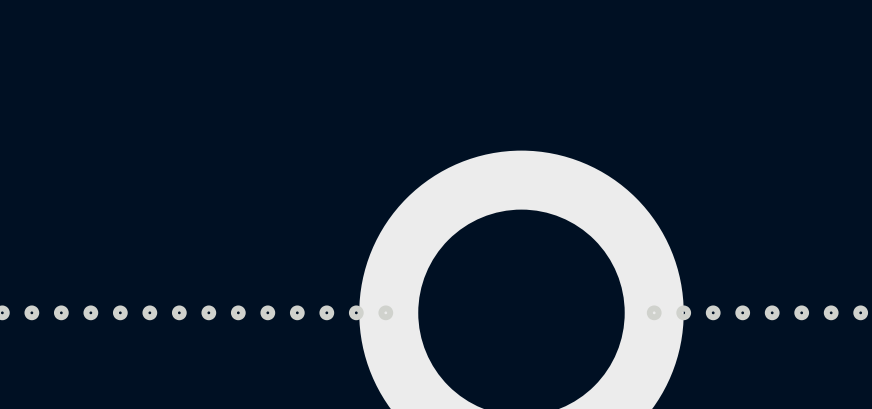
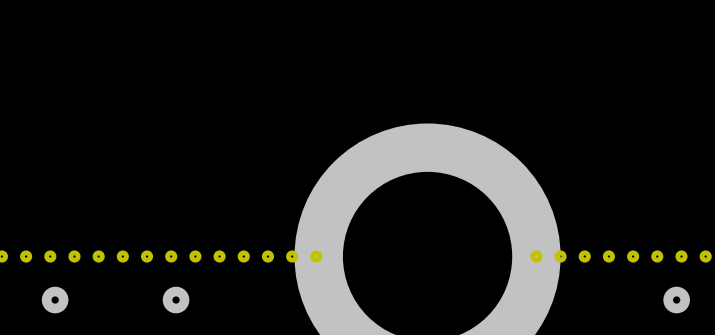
via: none -> (55, 300)
via: none -> (176, 300)
via: none -> (676, 300)

